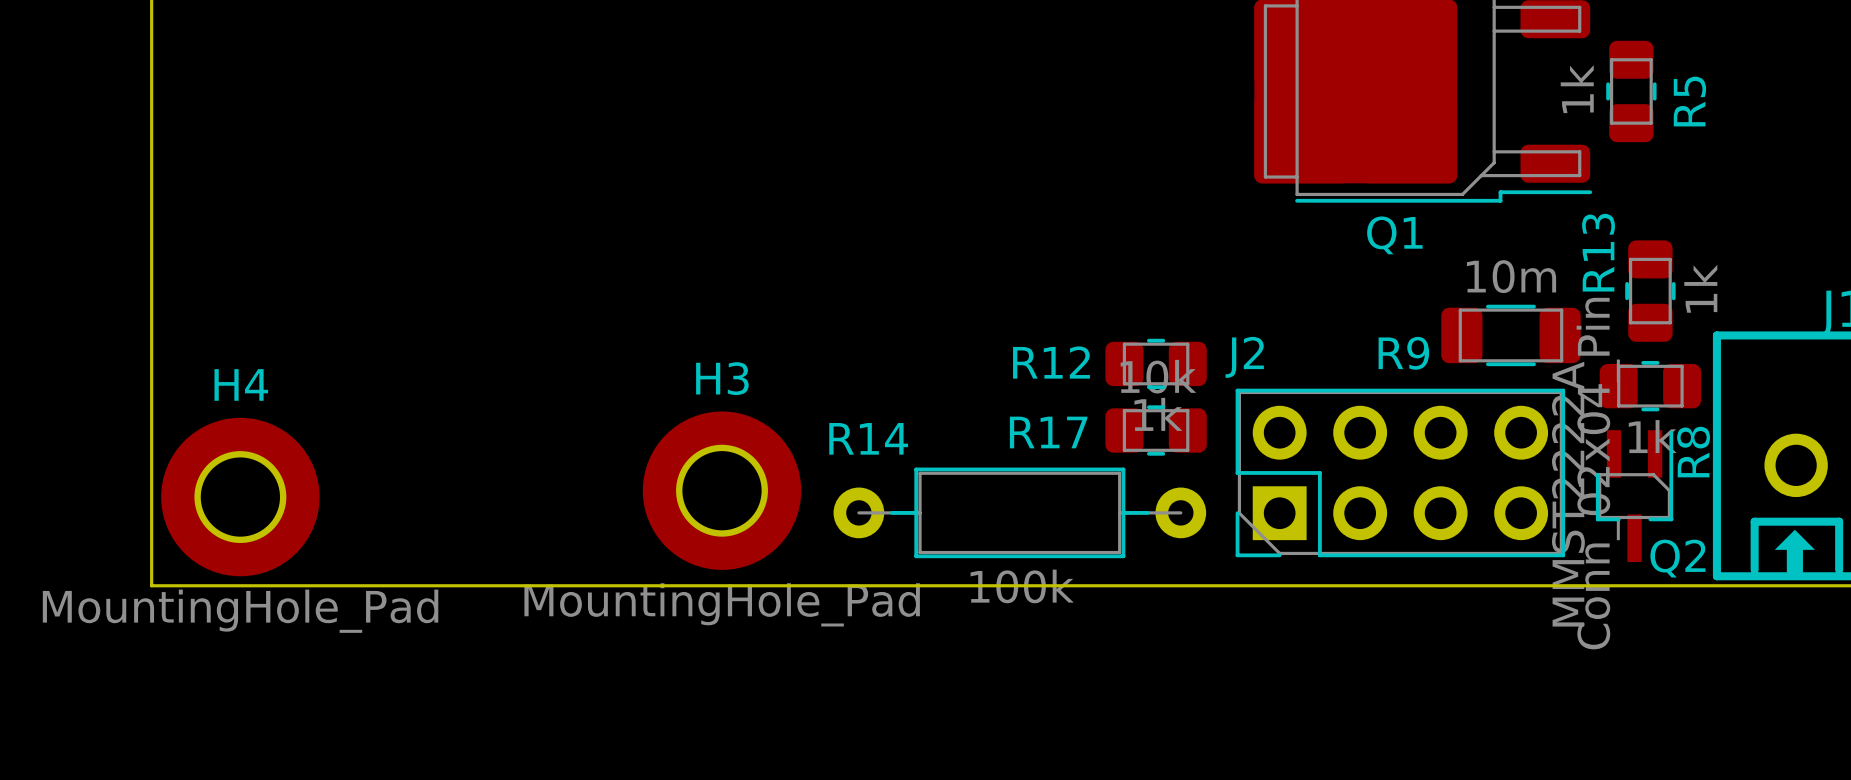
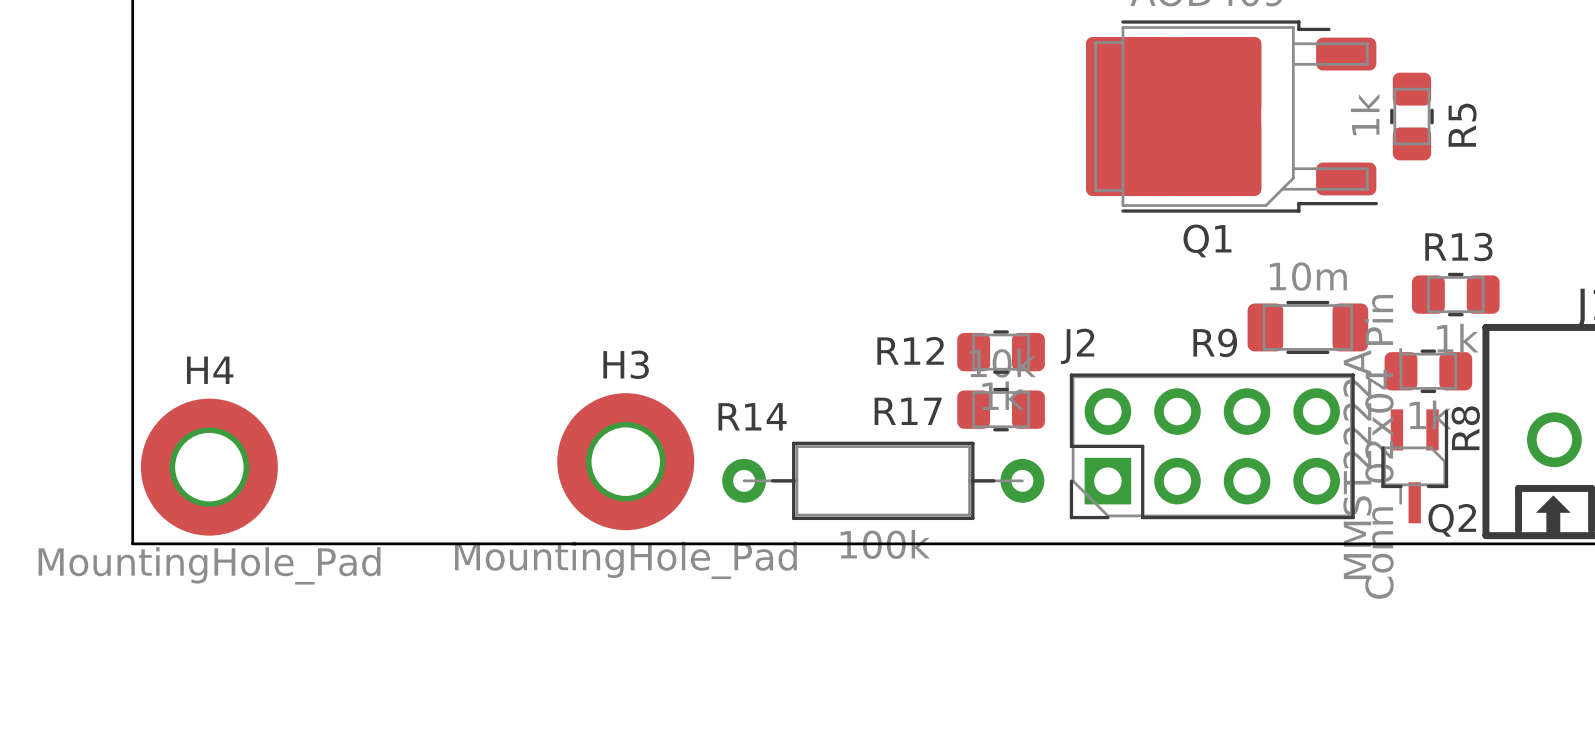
R13 rotation: 0° (1650, 291) -> 90° clockwise (1455, 294)

